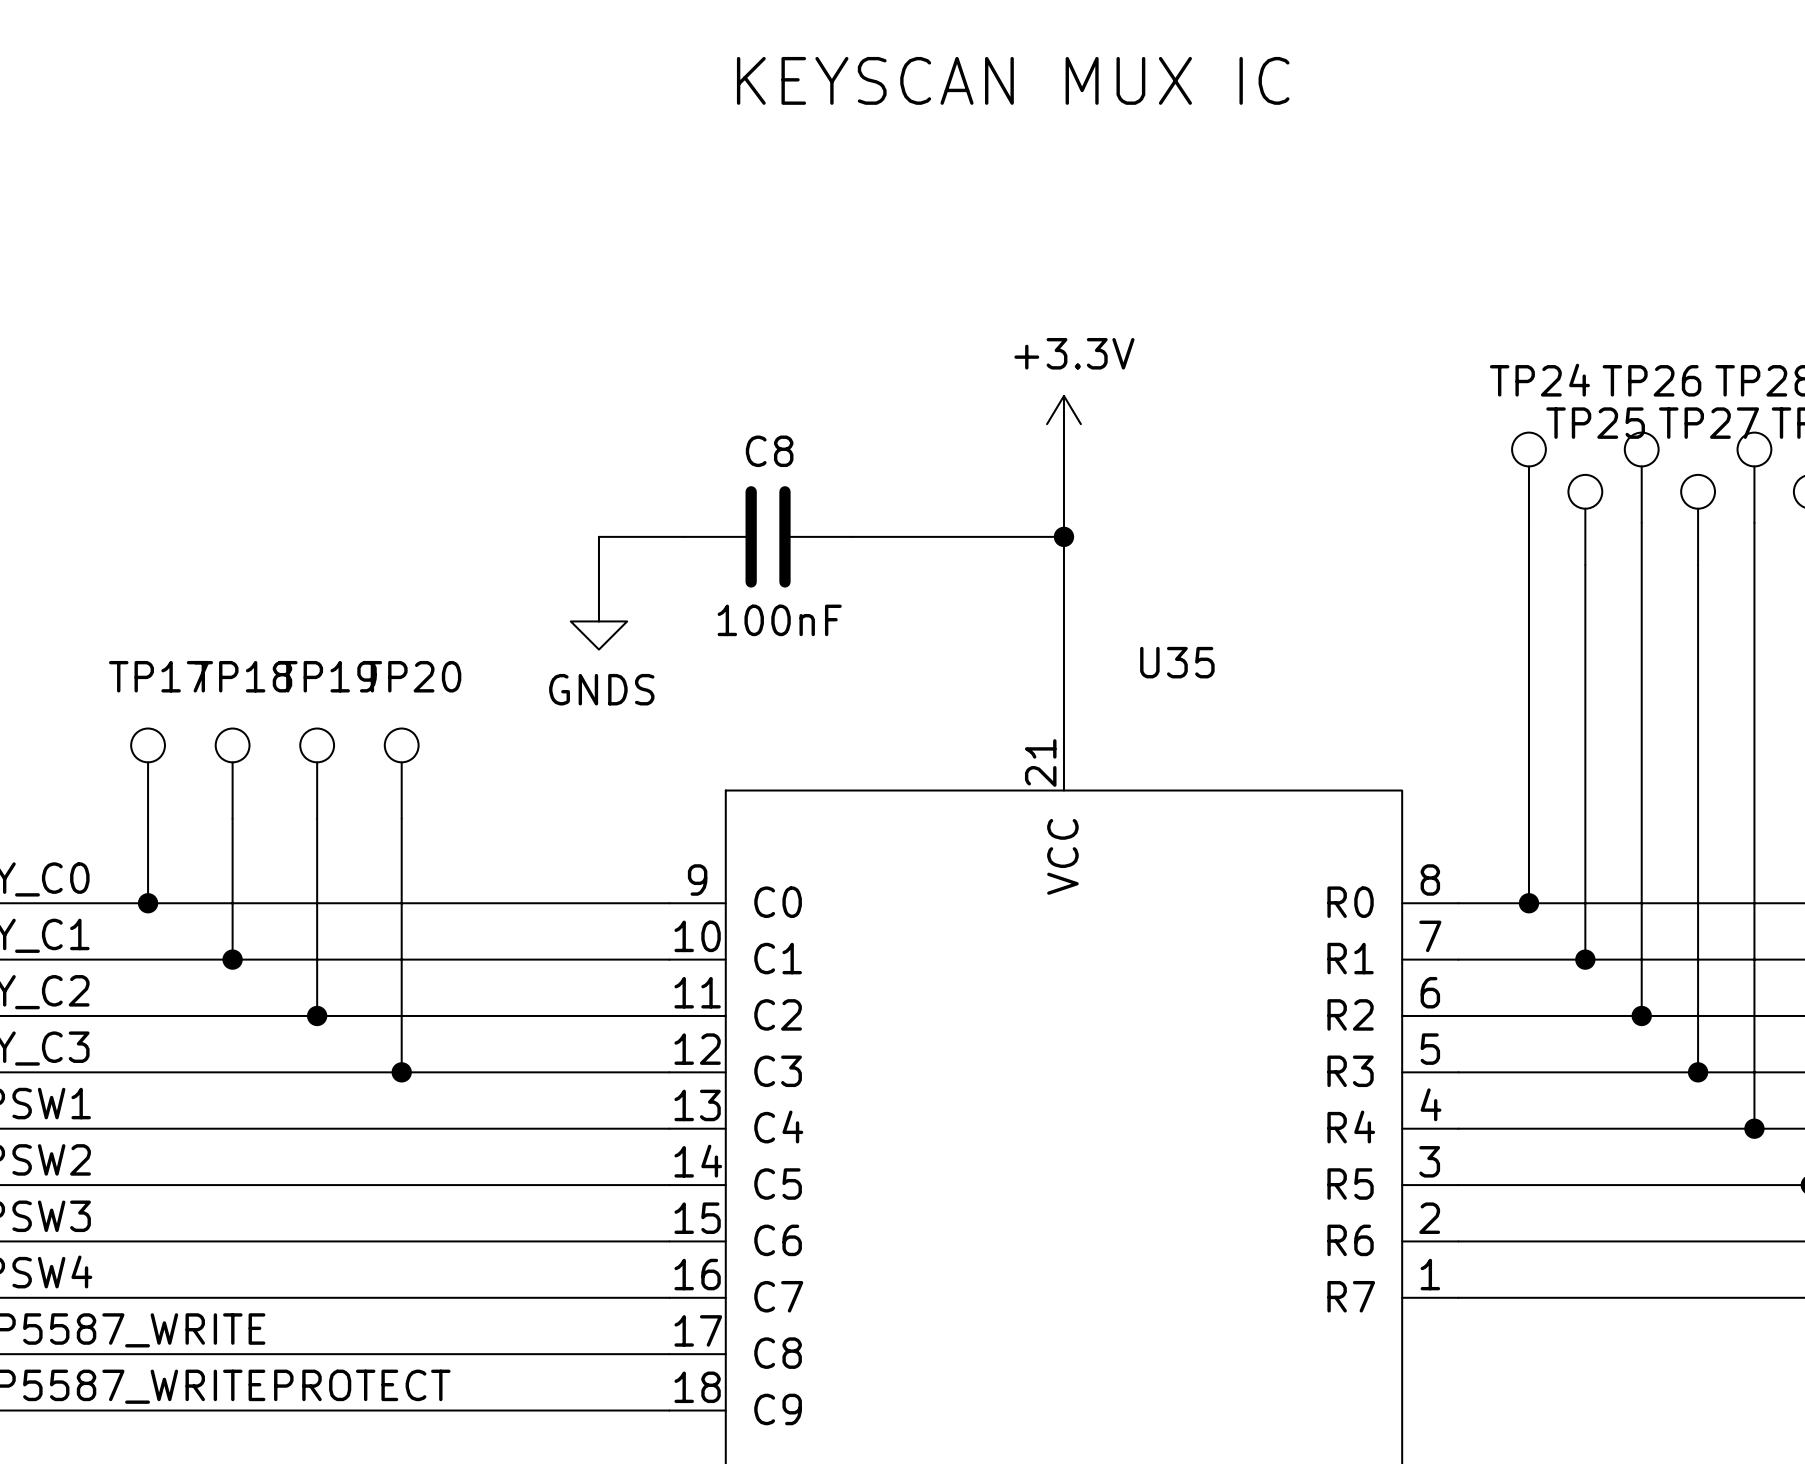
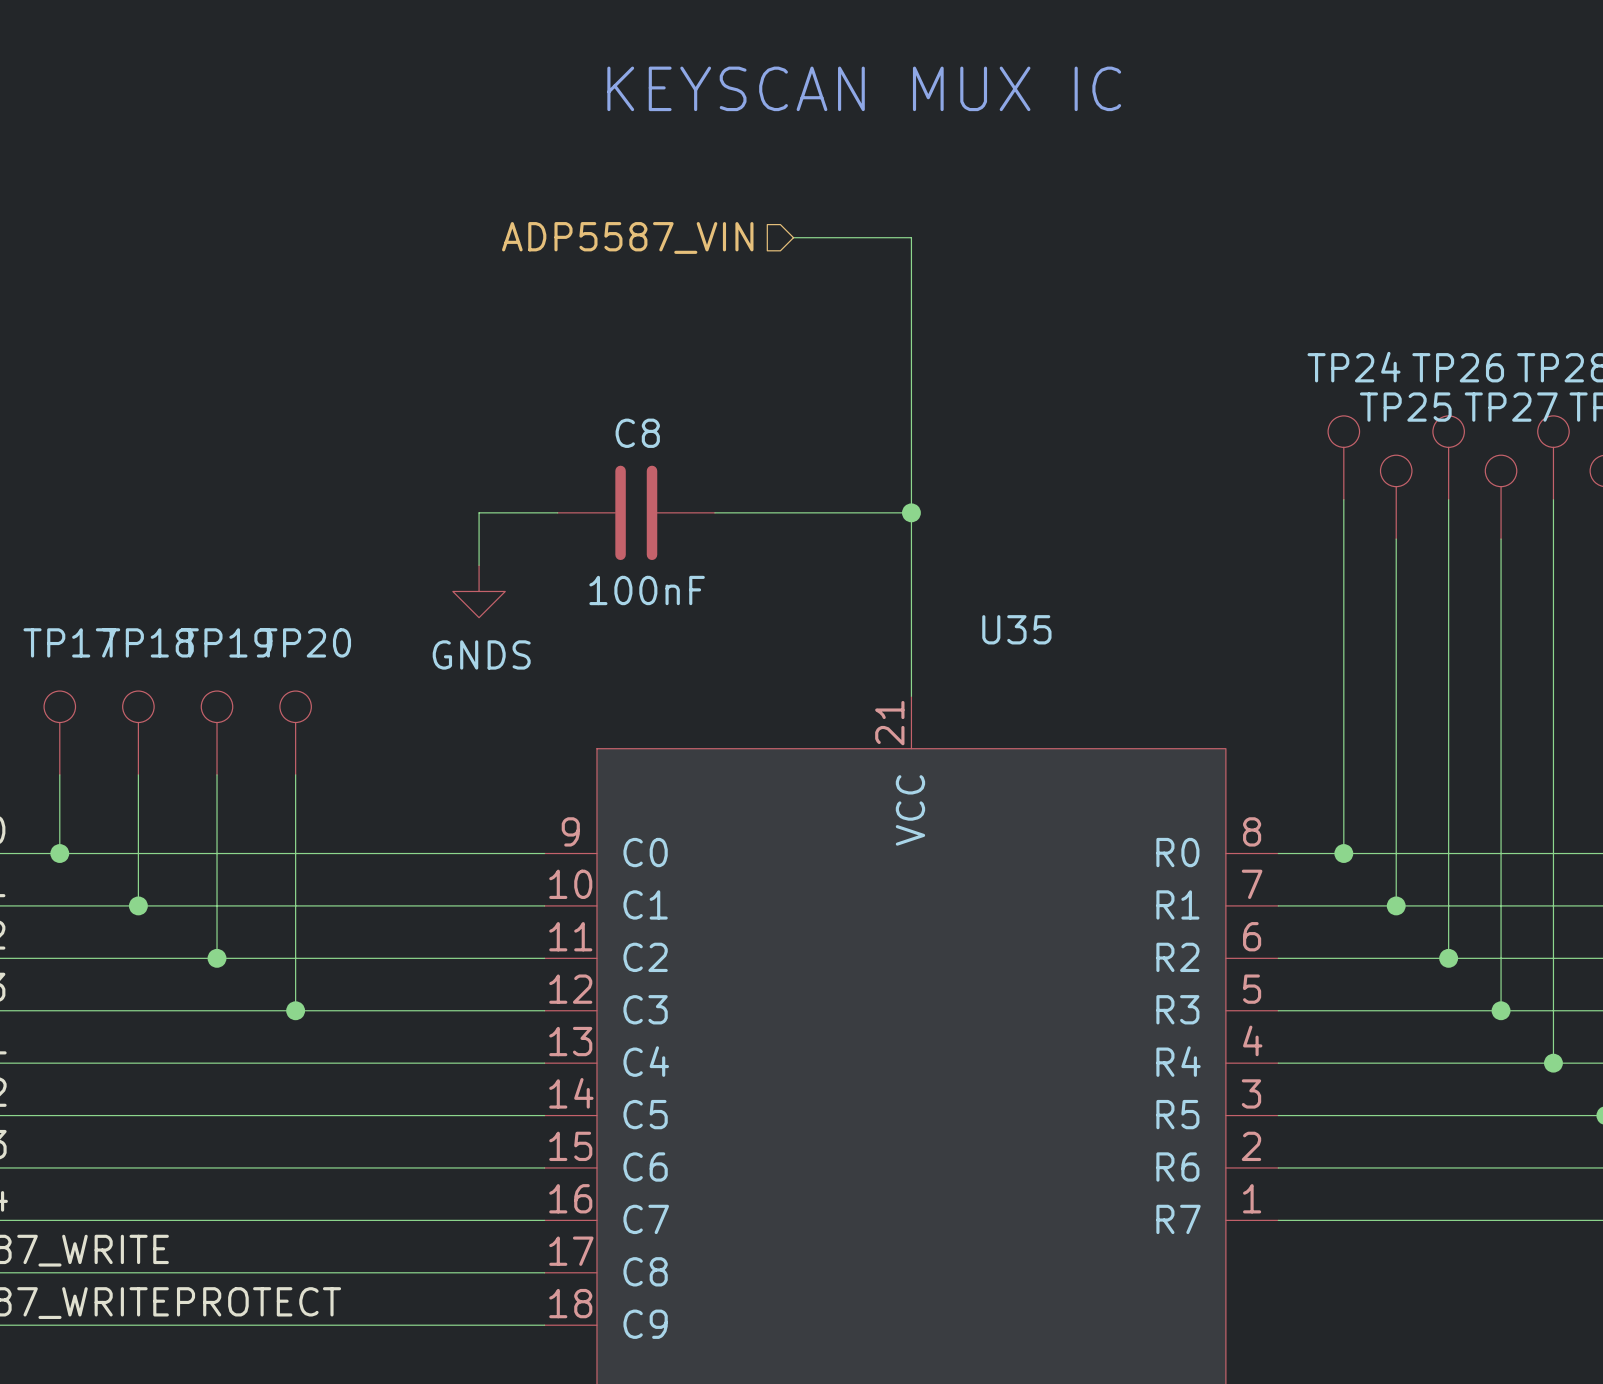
wire: none -> (793, 237) (911, 237) (911, 434)
hierarchical label: none -> ADP5587_VIN (627, 237)
power symbol: +3.3V (1063, 424) -> none

